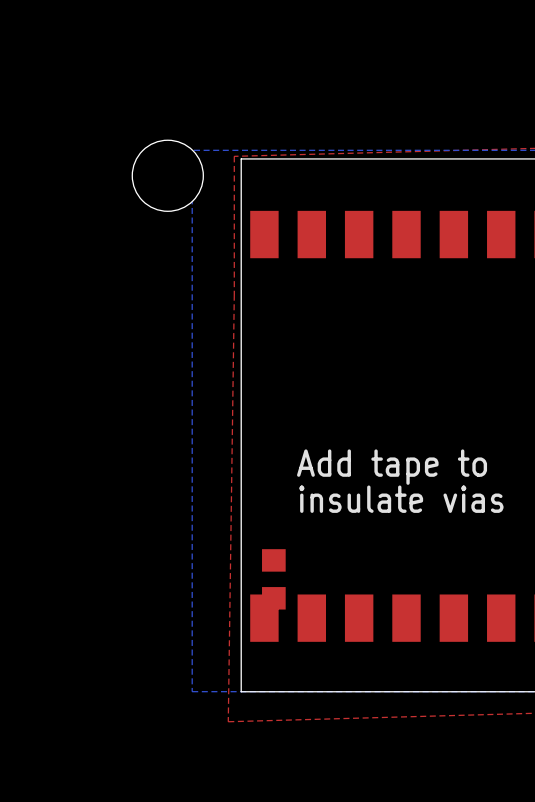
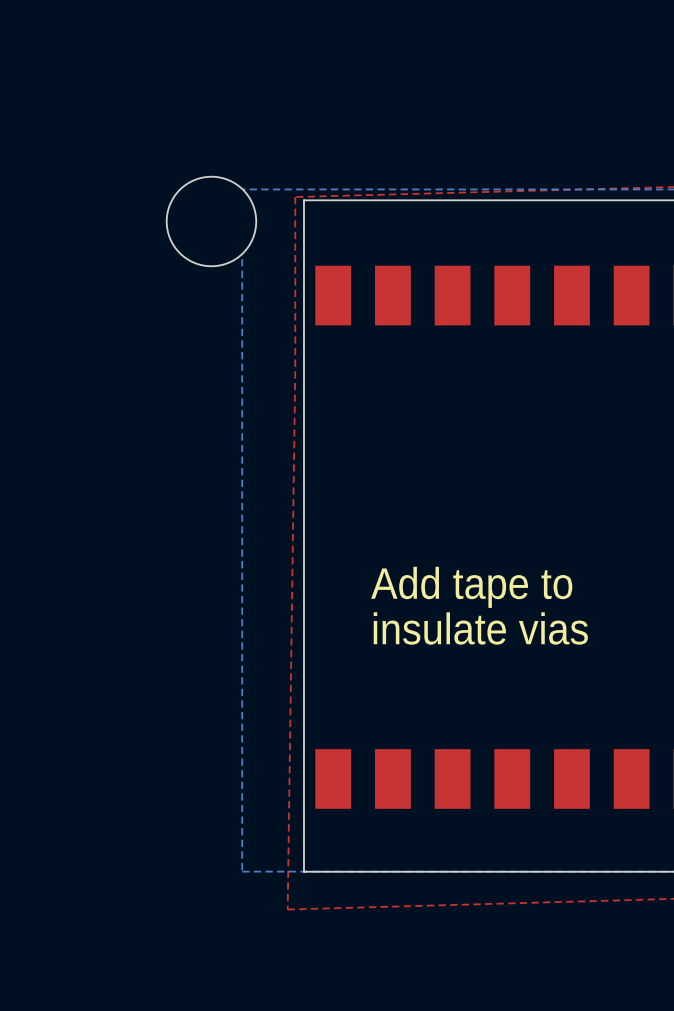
part: (273, 579) -> none

